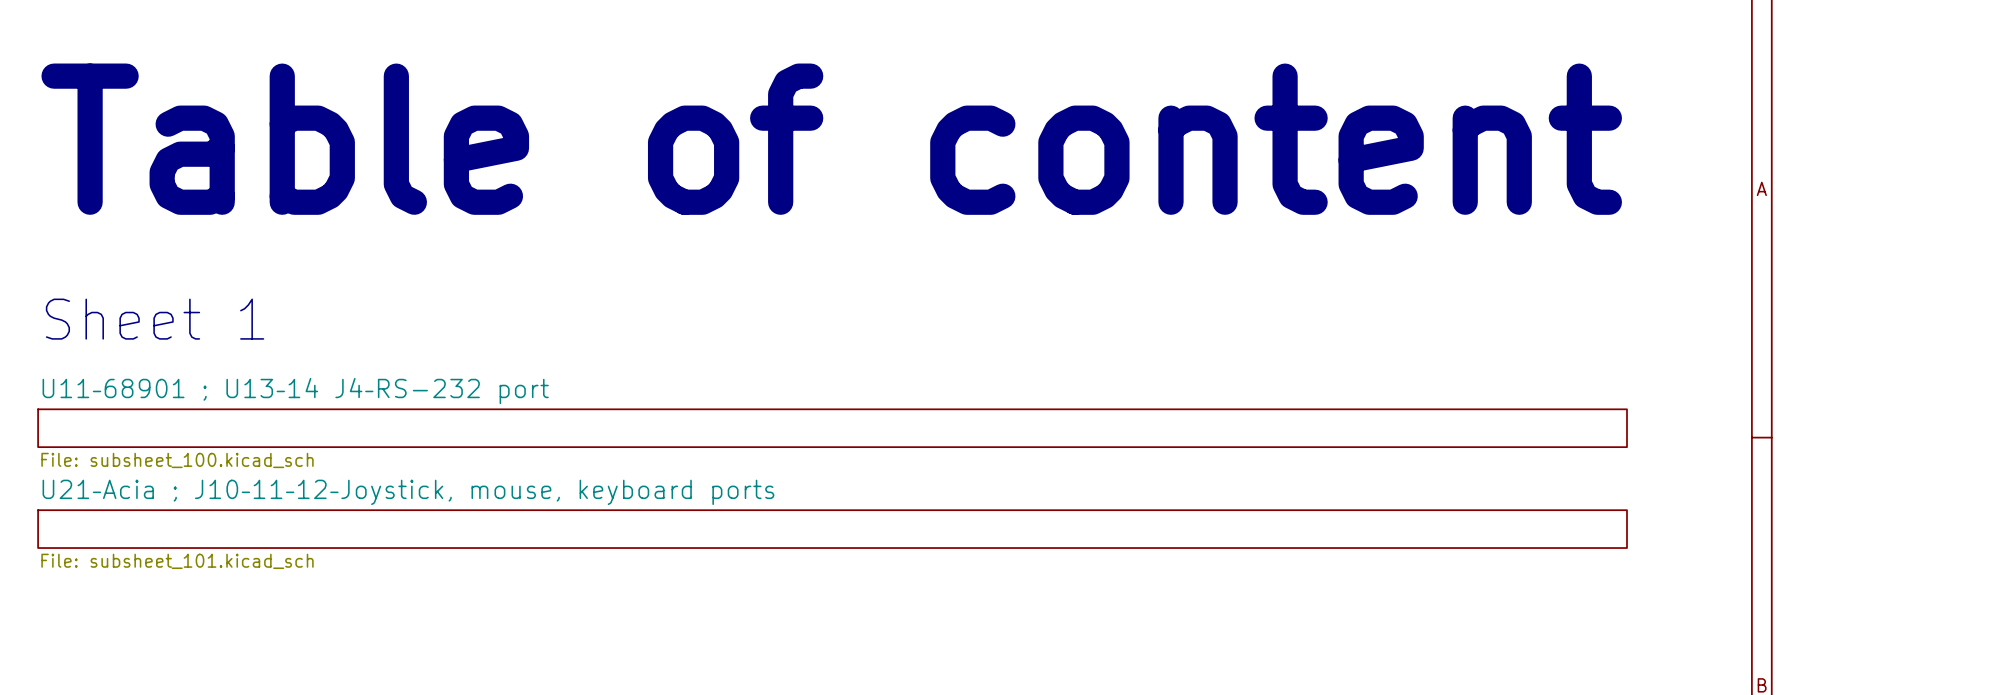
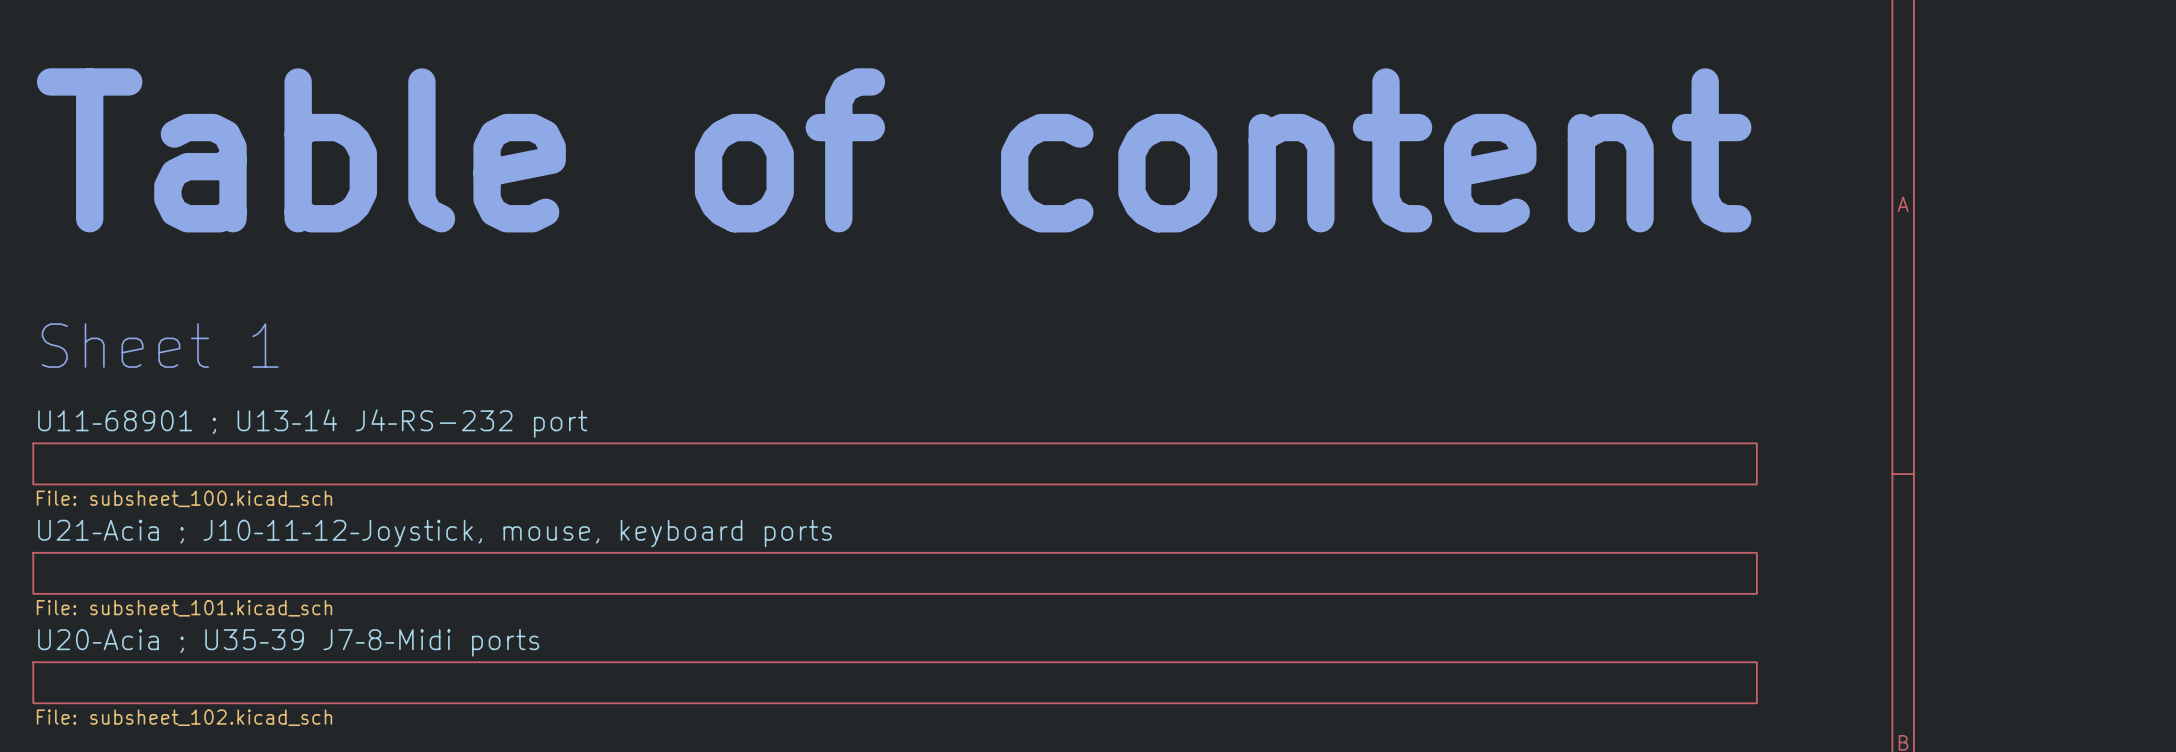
sheet U20–Acia ; U35–39 J7–8–Midi ports: none -> File: subsheet_102.kicad_sch (895, 682)

